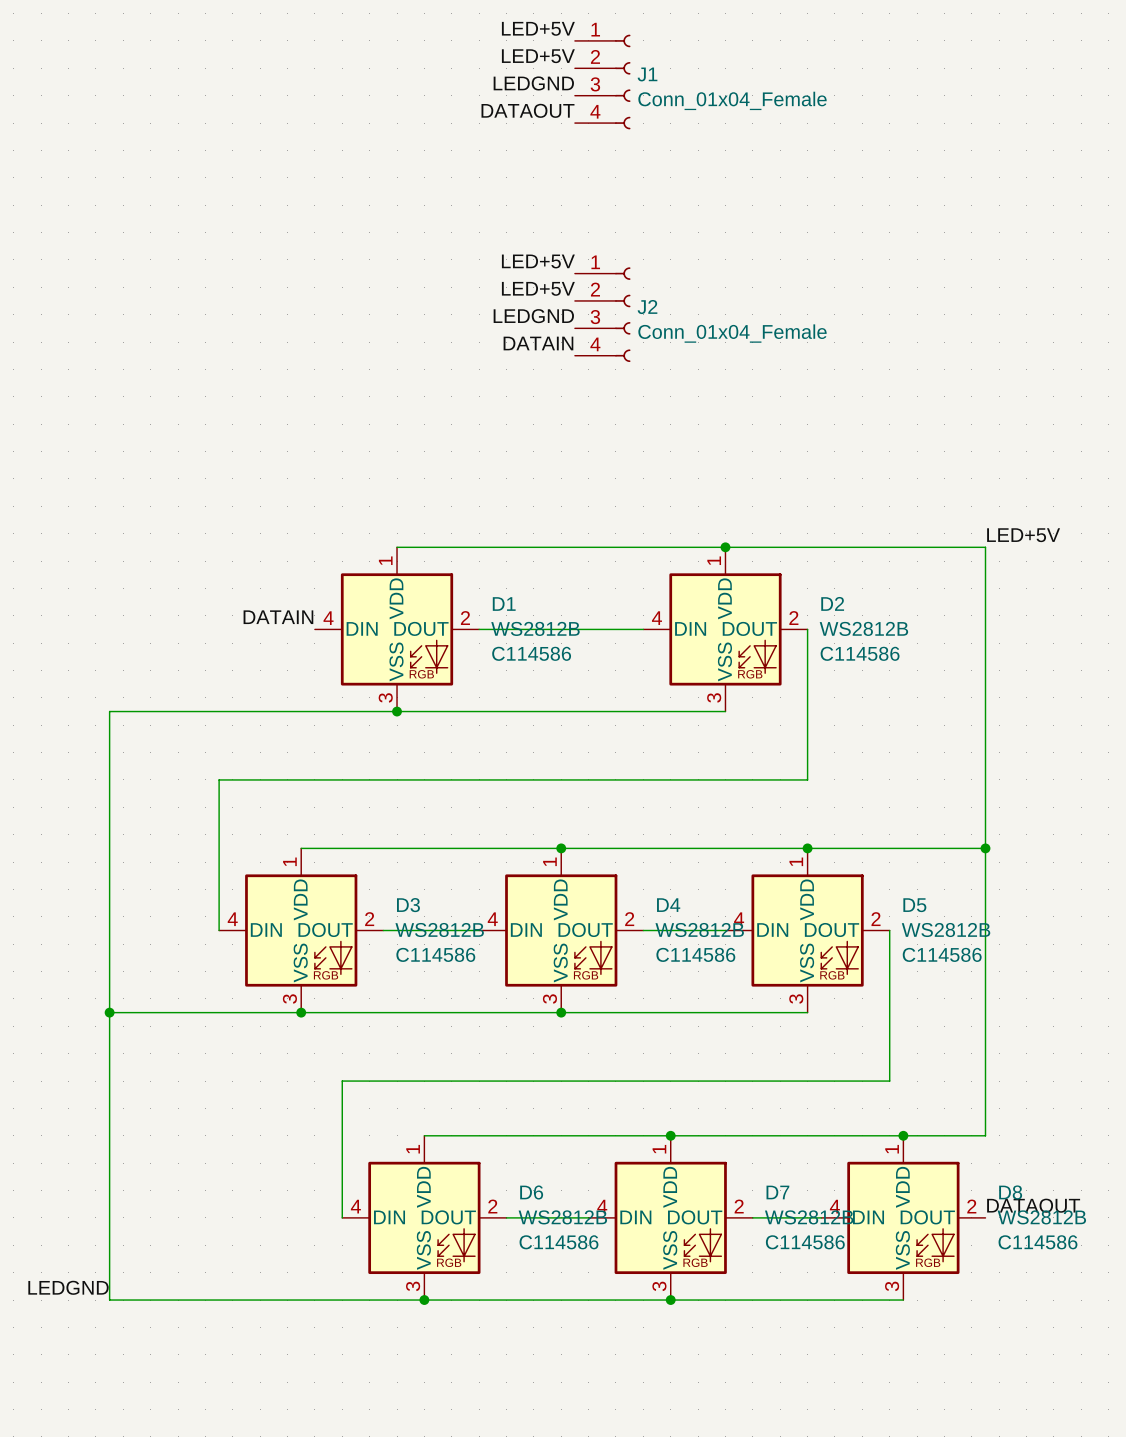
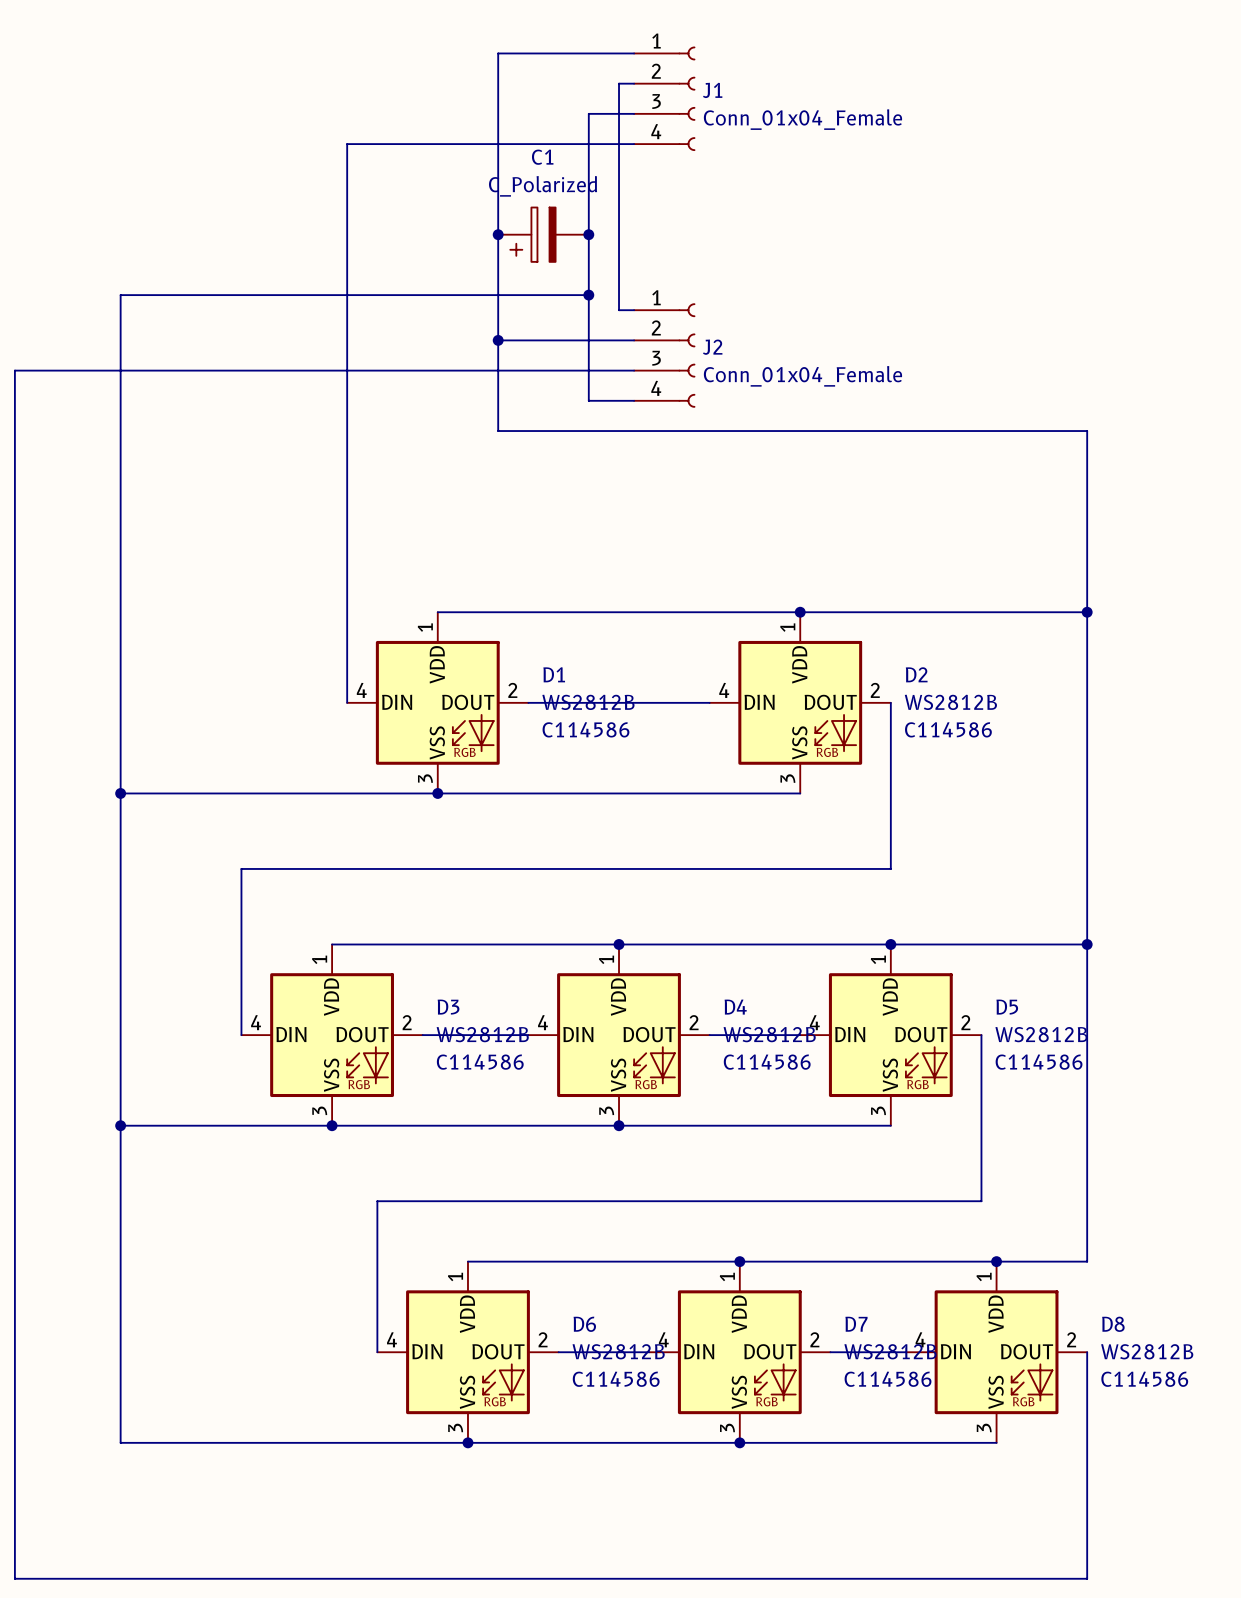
label: LED+5V (538, 28) -> none
wire: none -> (634, 53) (498, 53) (498, 431) (1087, 431) (1087, 612)
label: LED+5V (538, 56) -> none
wire: none -> (634, 83) (619, 83) (619, 310) (634, 310)
label: LEDGND (533, 83) -> none
wire: none -> (634, 113) (588, 113) (588, 400) (634, 400)
label: DATAOUT (527, 110) -> none
wire: none -> (634, 144) (347, 144) (347, 702)
junction: none -> (498, 234)
C1: none -> C_Polarized (543, 234)
junction: none -> (588, 234)
wire: none -> (588, 295) (120, 295) (120, 793)
junction: none -> (588, 295)
label: LED+5V (538, 261) -> none
label: LED+5V (538, 288) -> none
wire: none -> (498, 340) (634, 340)
junction: none -> (498, 340)
label: LEDGND (533, 316) -> none
wire: none -> (634, 370) (14, 370) (14, 1578) (1087, 1578) (1087, 1352)
label: DATAIN (538, 343) -> none
label: LED+5V (1023, 535) -> none
junction: none -> (1087, 612)
label: DATAIN (278, 617) -> none
junction: none -> (120, 793)
label: DATAOUT (1033, 1205) -> none
label: LEDGND (68, 1287) -> none

